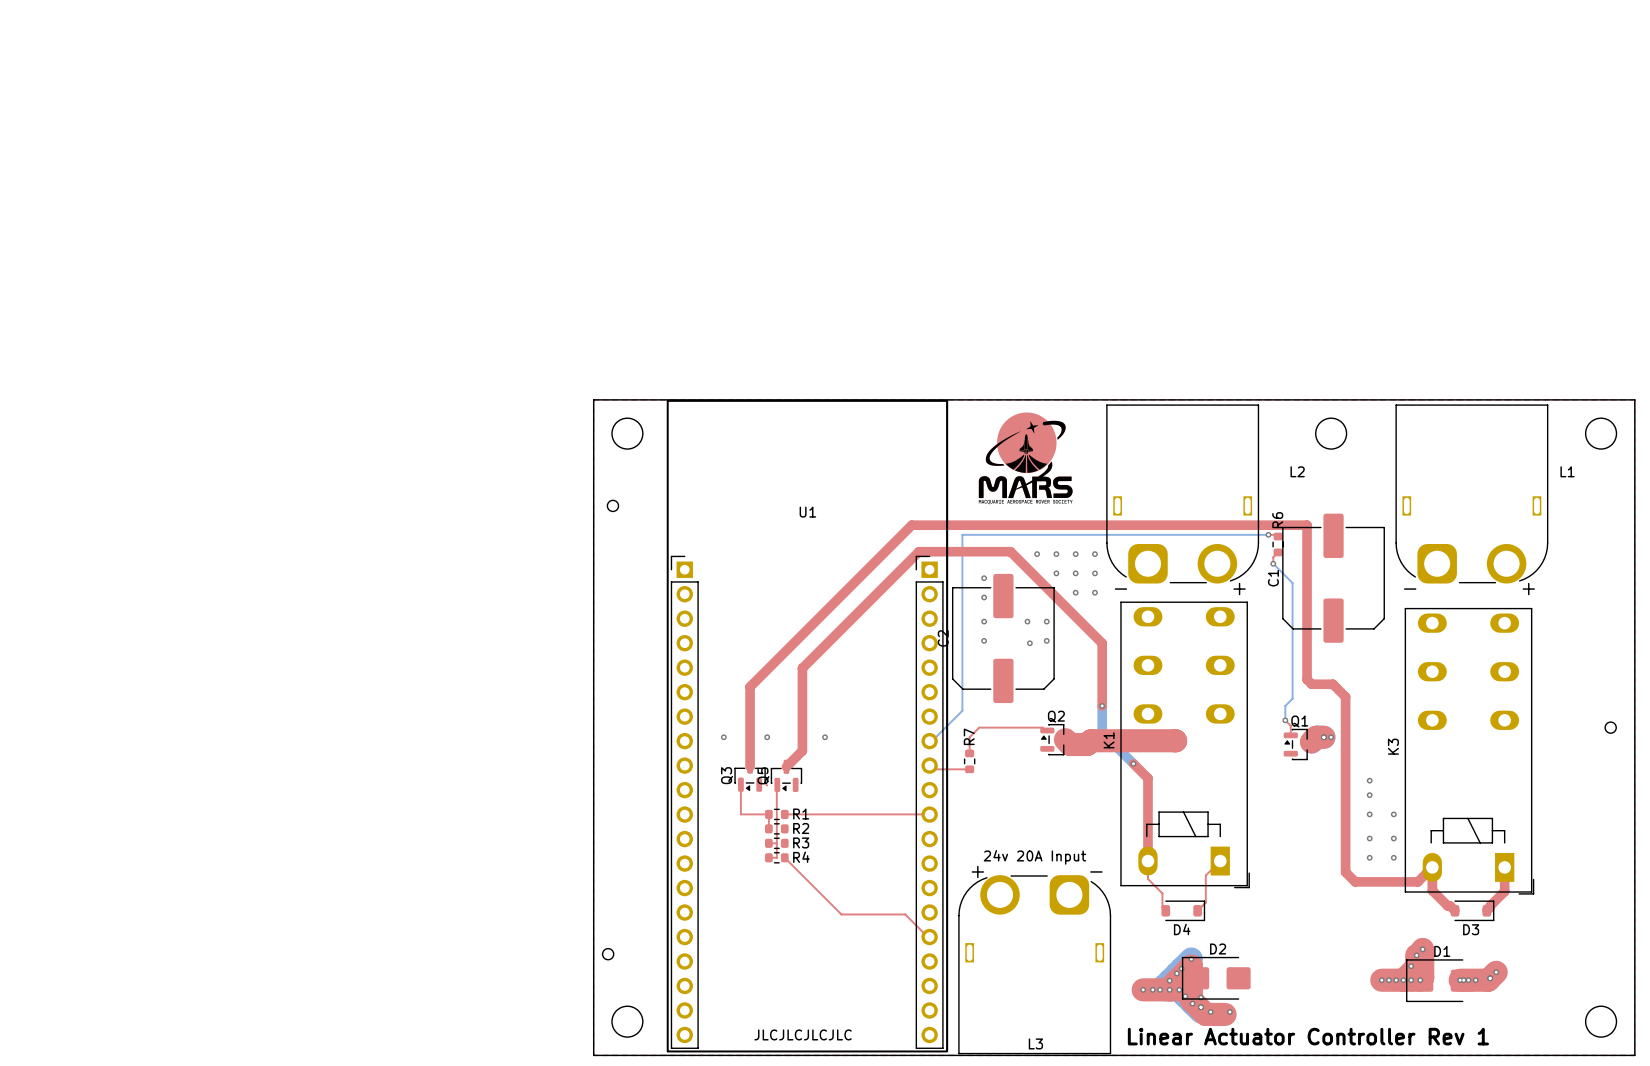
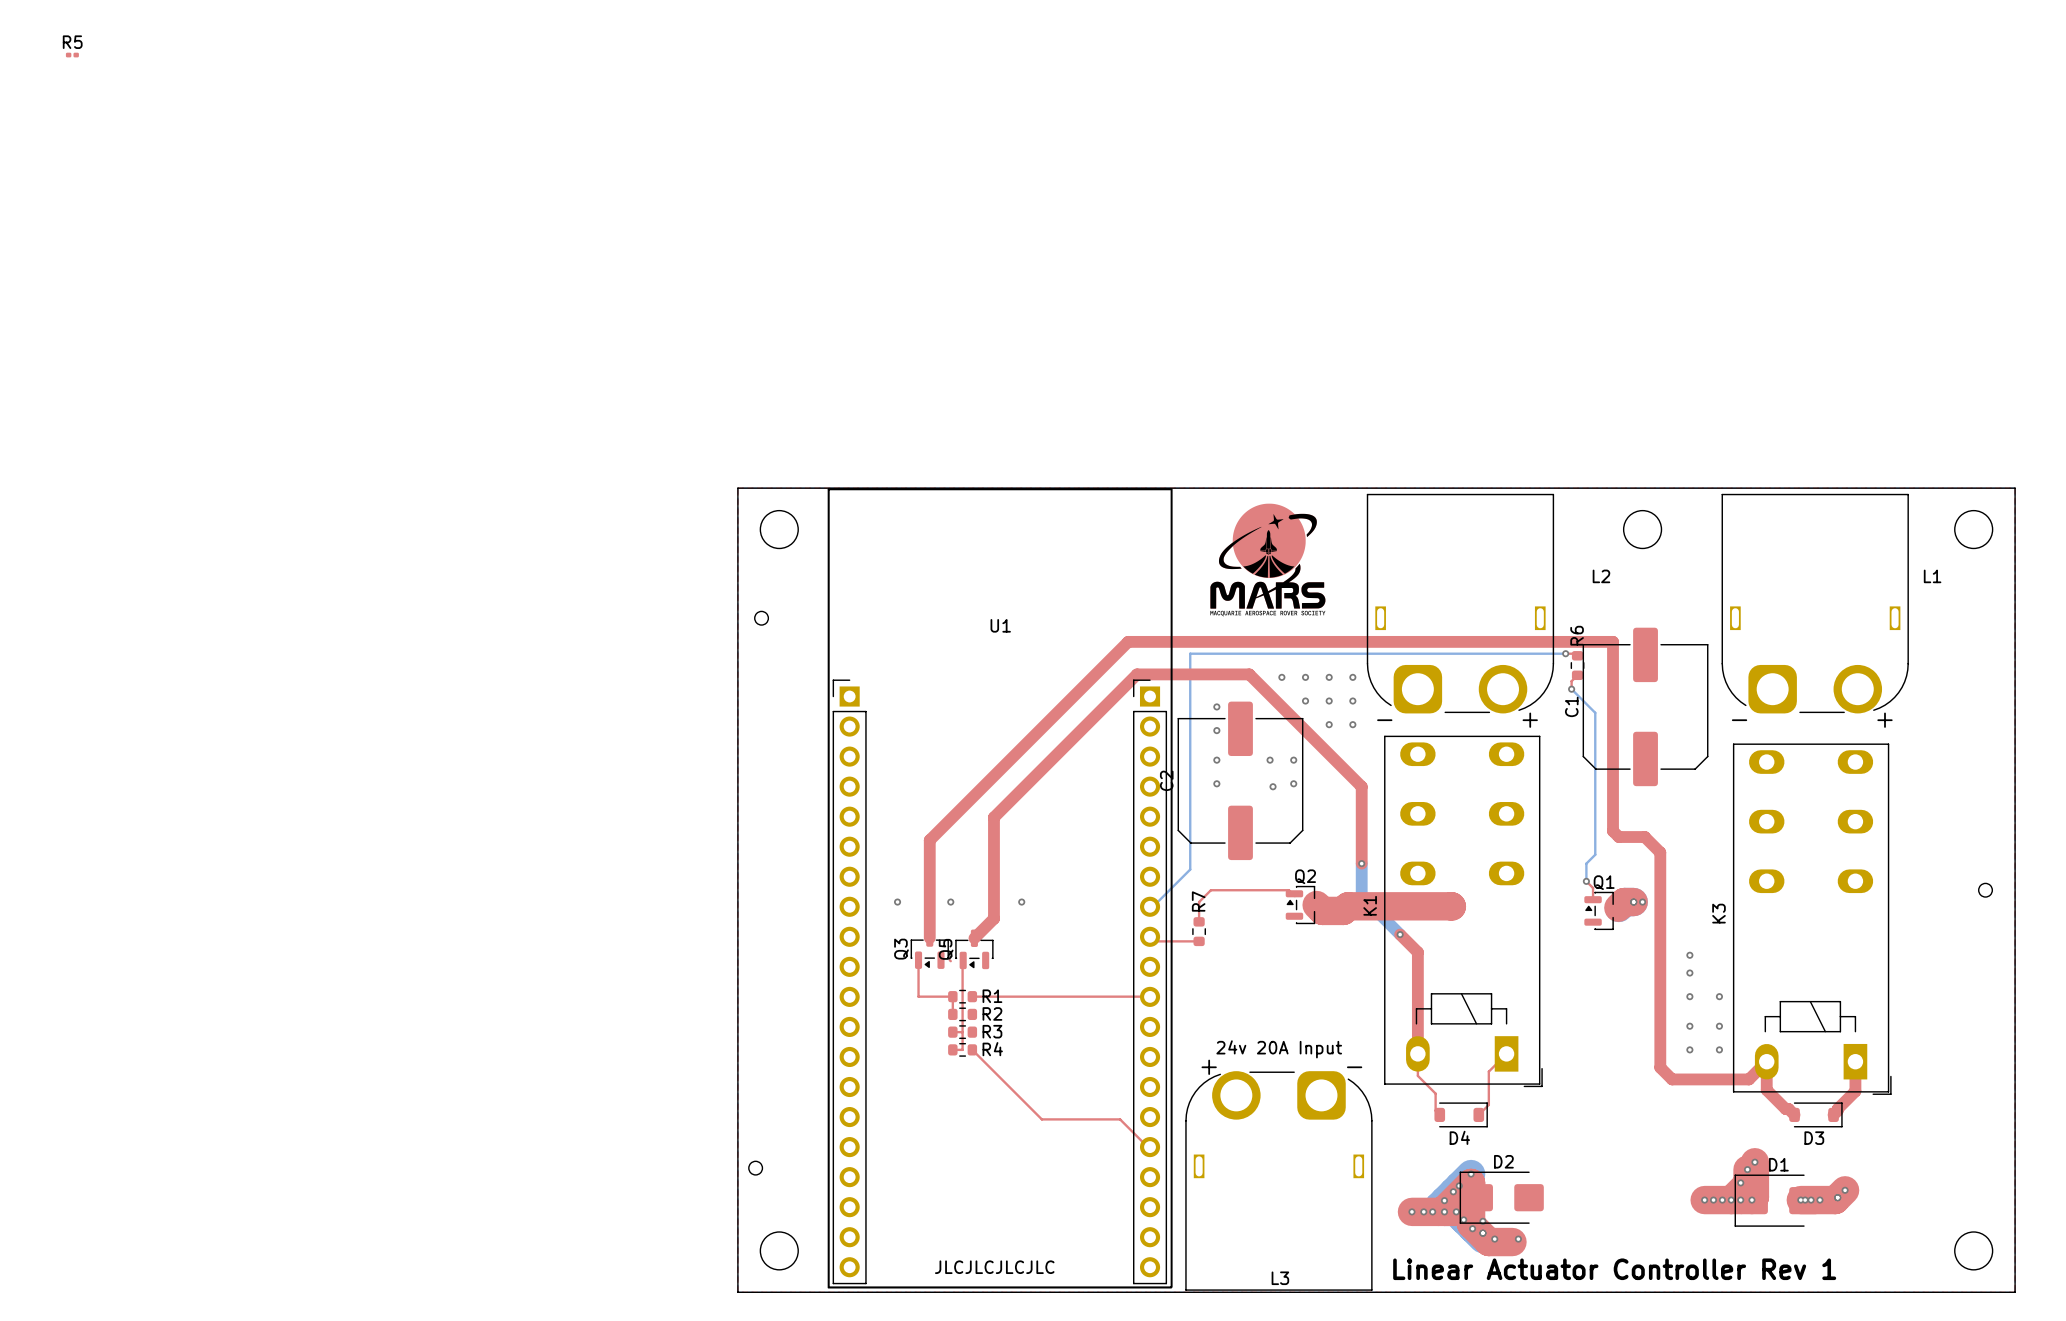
R5: none -> (72, 55)

